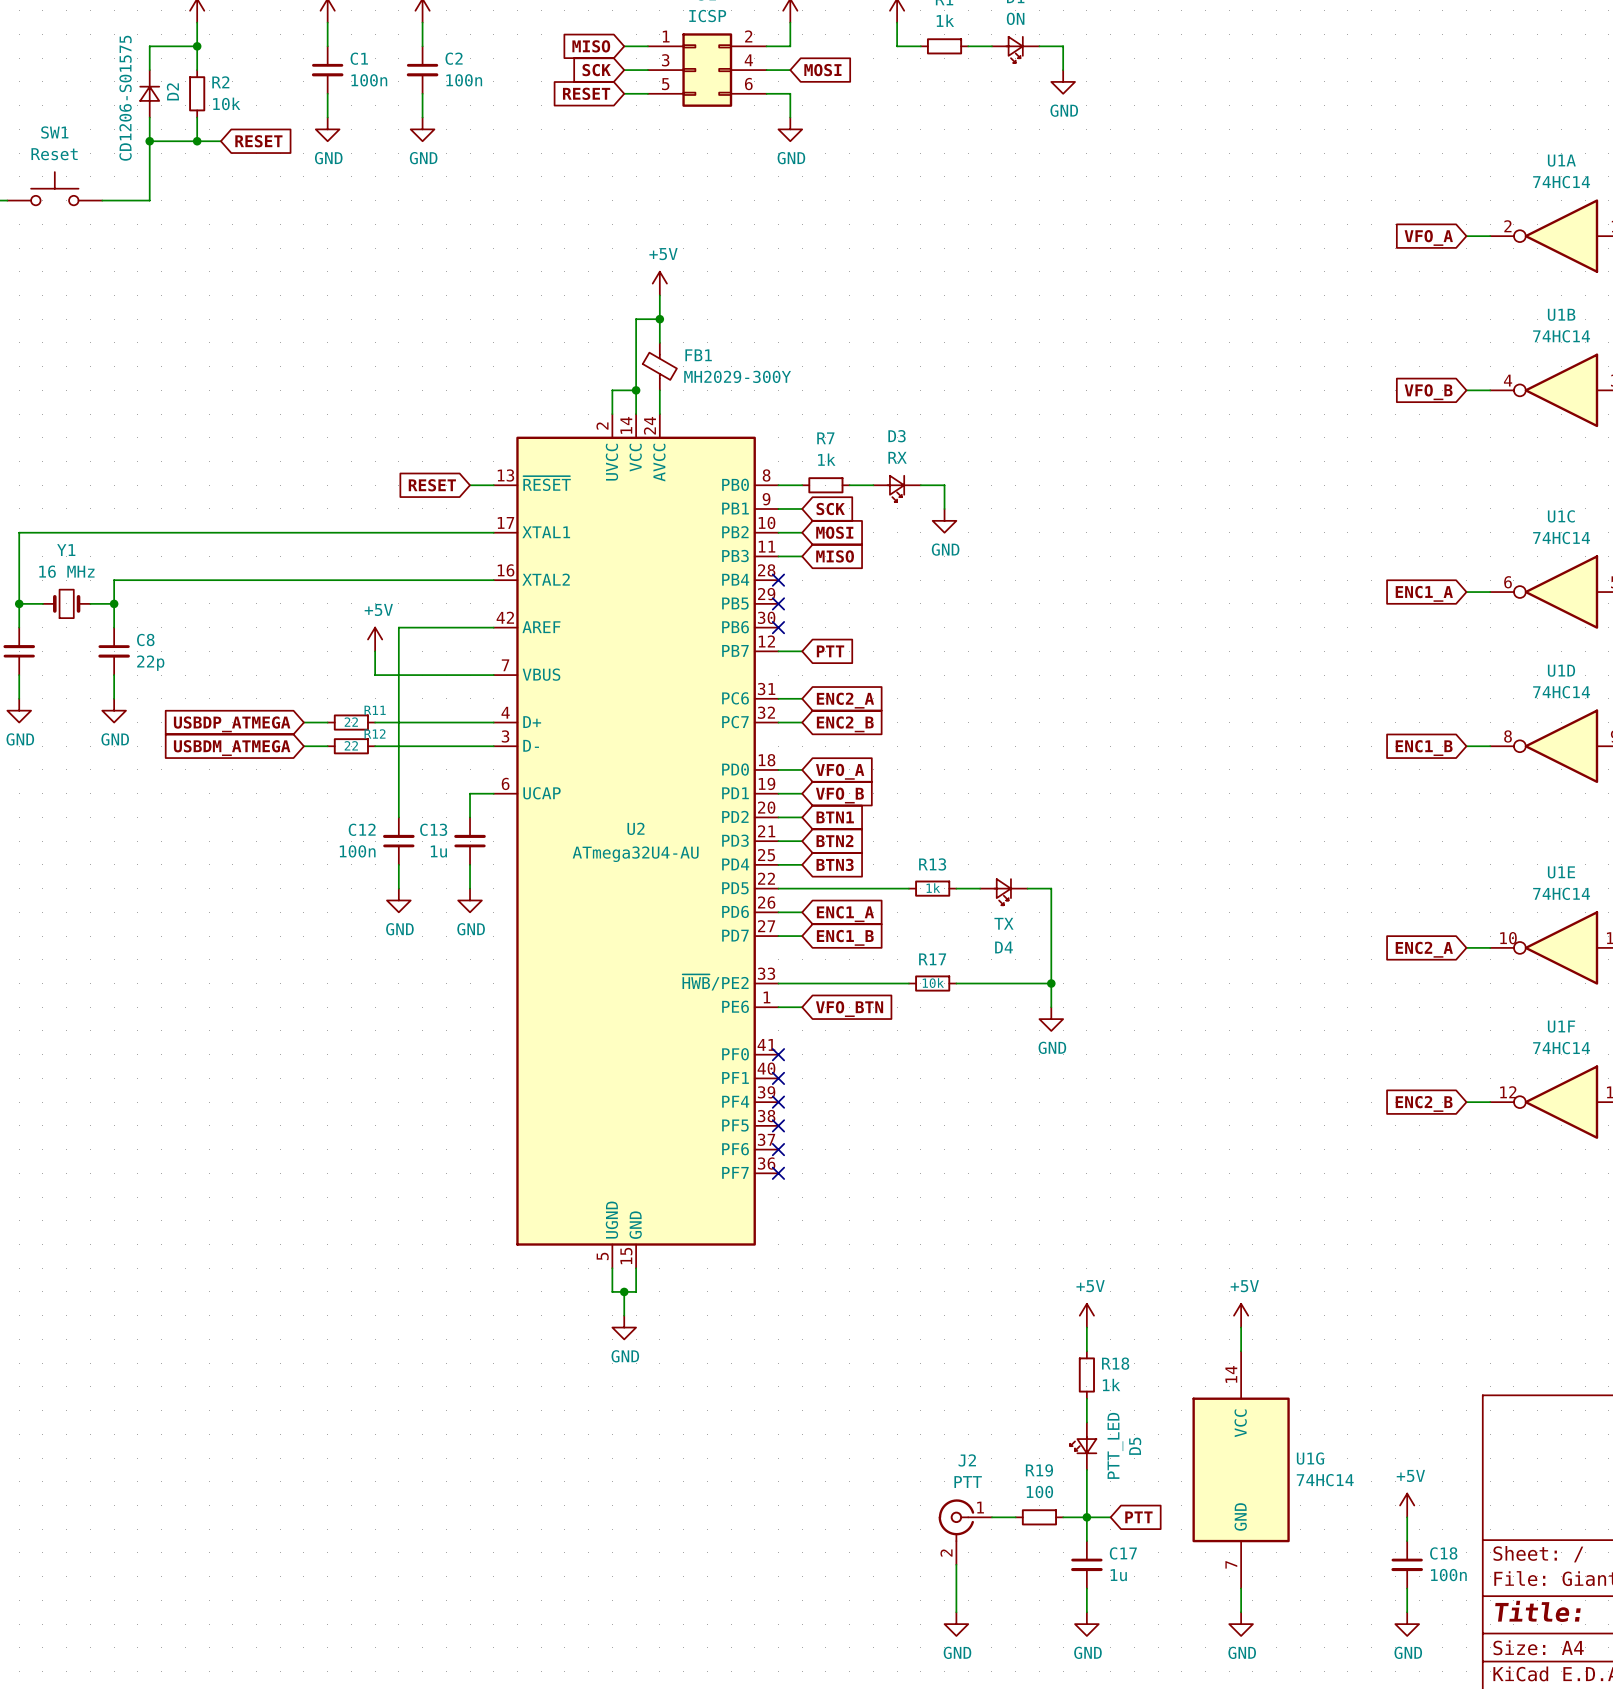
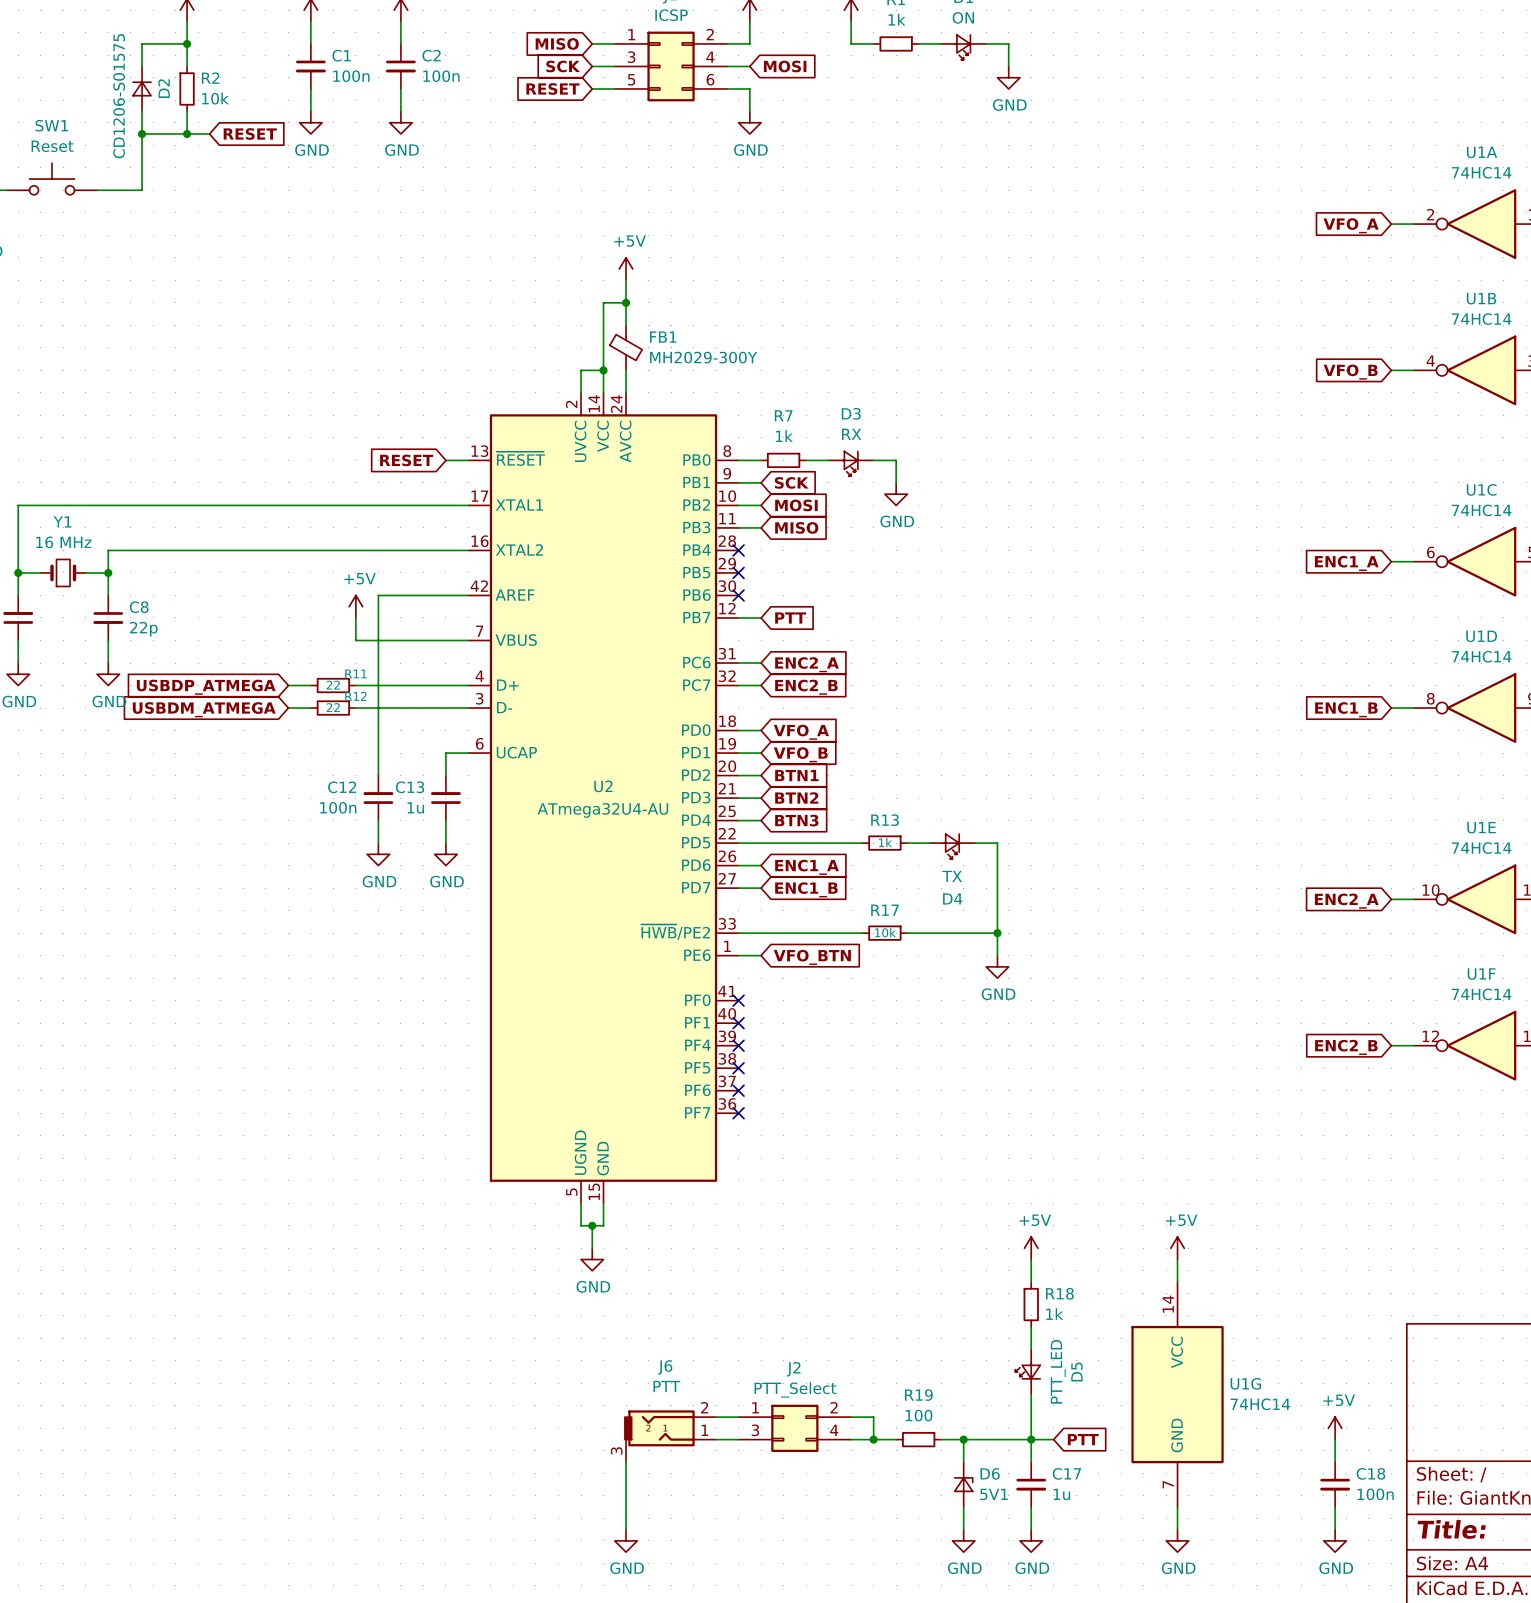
J2 value: PTT (968, 1482) -> PTT_Select (795, 1389)
wire: none -> (716, 1417) (738, 1417)
wire: none -> (851, 1417) (873, 1417) (873, 1439)
J2 symbol: [938, 1499, 992, 1565] -> [738, 1404, 852, 1453]
J6: none -> PTT (670, 1436)
wire: none -> (716, 1439) (738, 1439)
wire: none -> (851, 1439) (896, 1439)
junction: none -> (873, 1439)
junction: none -> (963, 1439)
R19 position: (1039, 1517) -> (918, 1439)
wire: none -> (1008, 1439) (963, 1439) (963, 1462)
wire: none -> (626, 1462) (626, 1529)
wire: (956, 1564) (956, 1612) -> none
D6: none -> 5V1 (963, 1484)
wire: none -> (963, 1507) (963, 1529)
power symbol: none -> GND (626, 1540)
power symbol position: GND (956, 1624) -> GND (963, 1540)

